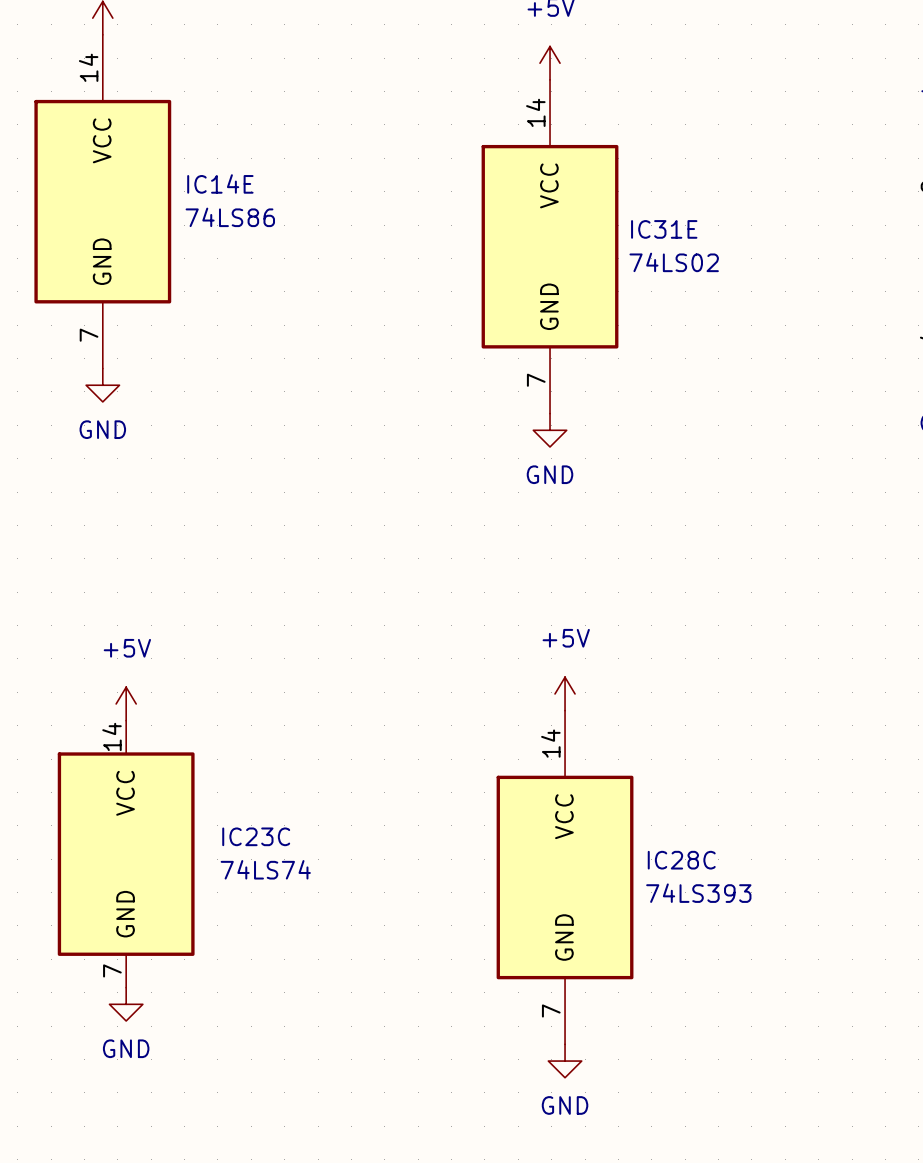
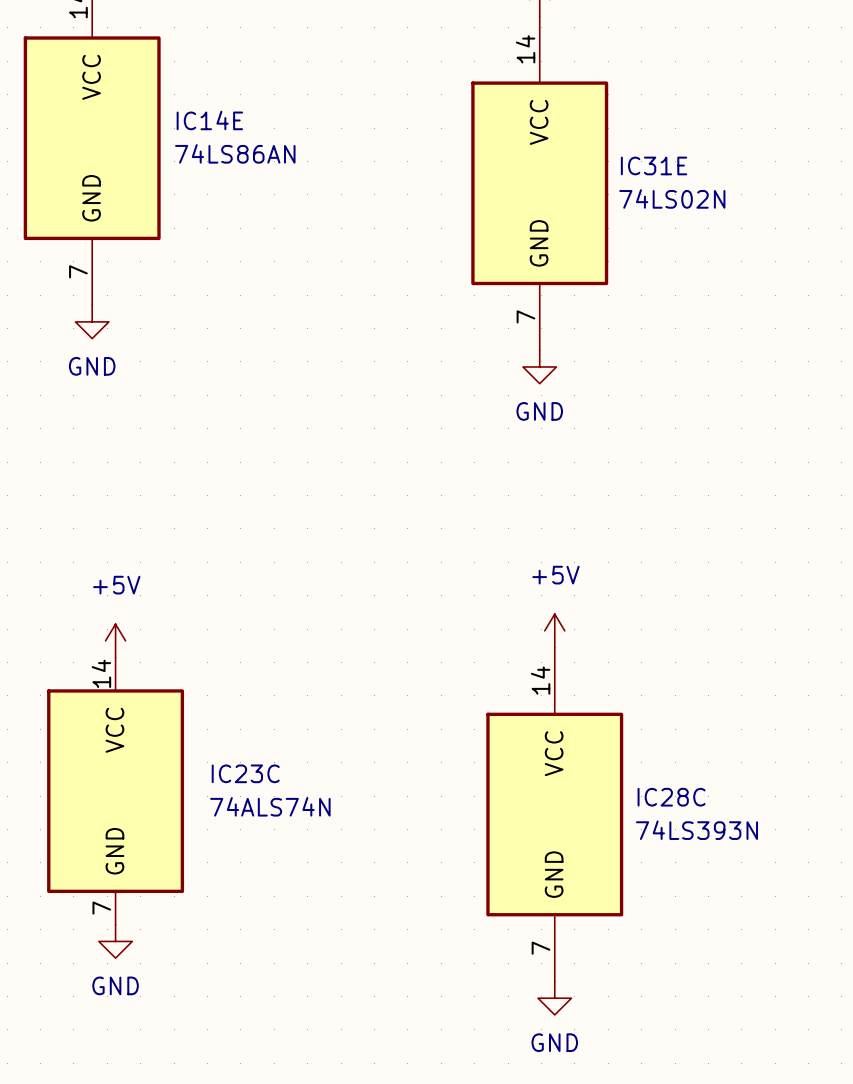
IC14E value: 74LS86 (230, 217) -> 74LS86AN (235, 153)
IC31E value: 74LS02 (674, 262) -> 74LS02N (672, 198)
IC23C value: 74LS74 (265, 869) -> 74ALS74N (270, 806)
IC28C value: 74LS393 (698, 893) -> 74LS393N (696, 830)

